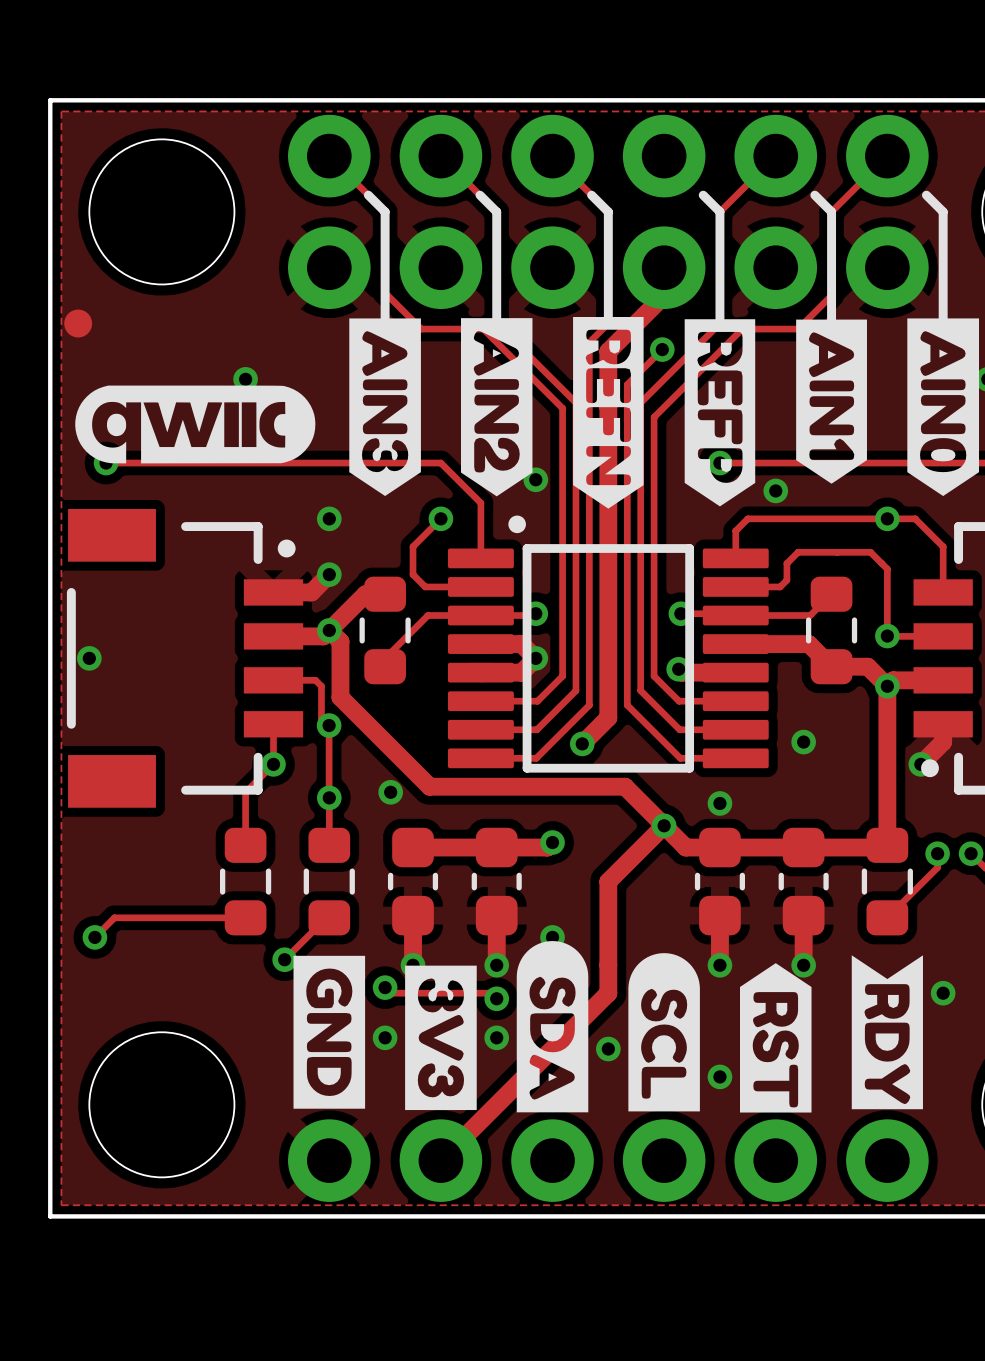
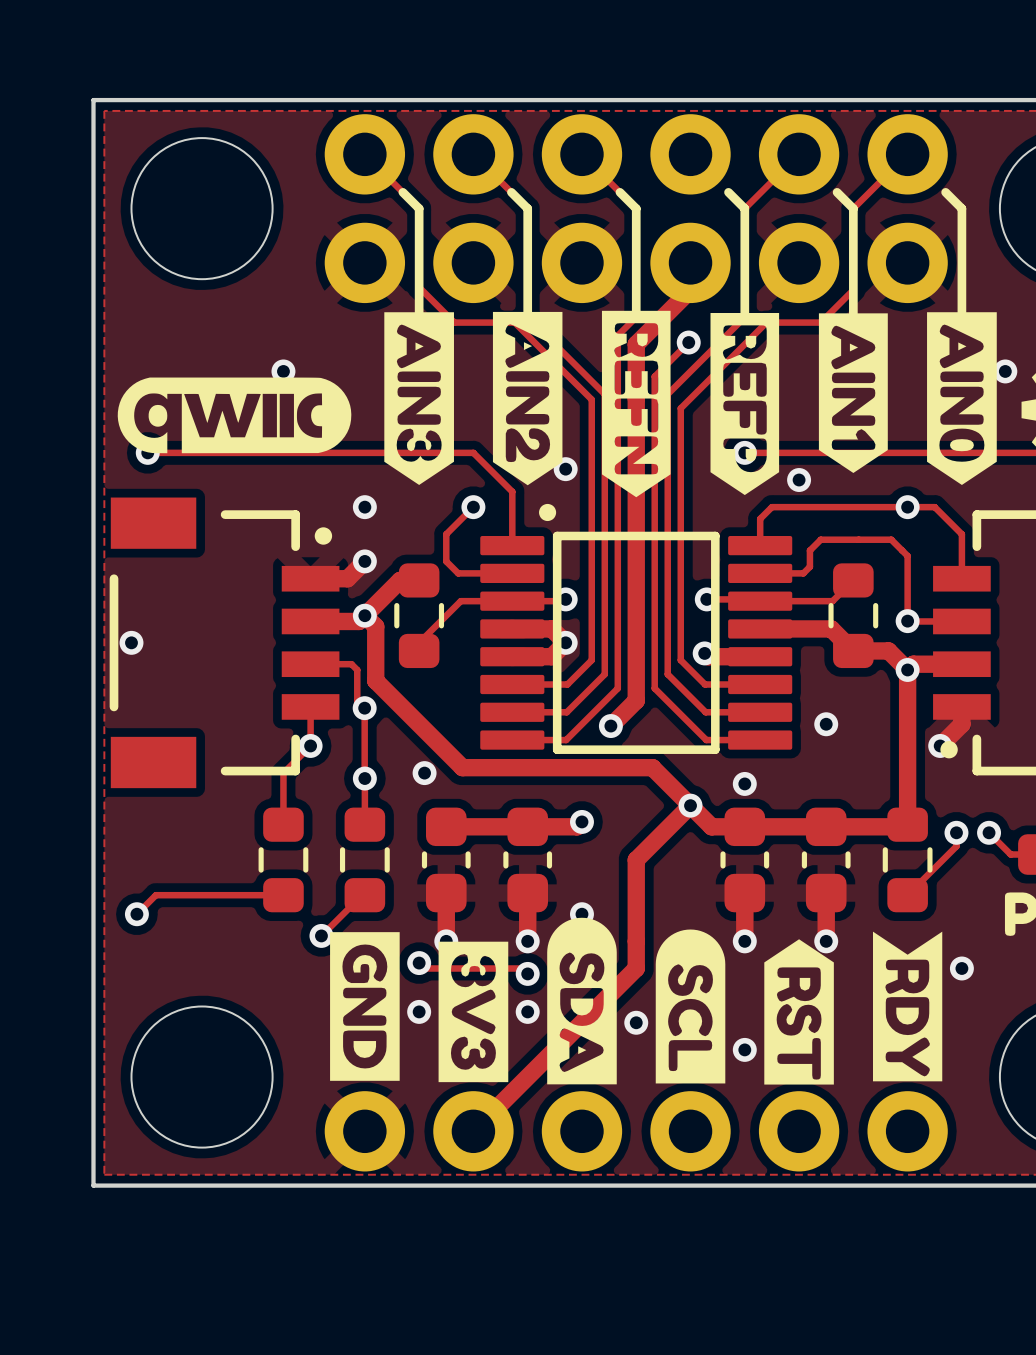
part: (78, 323) -> none

